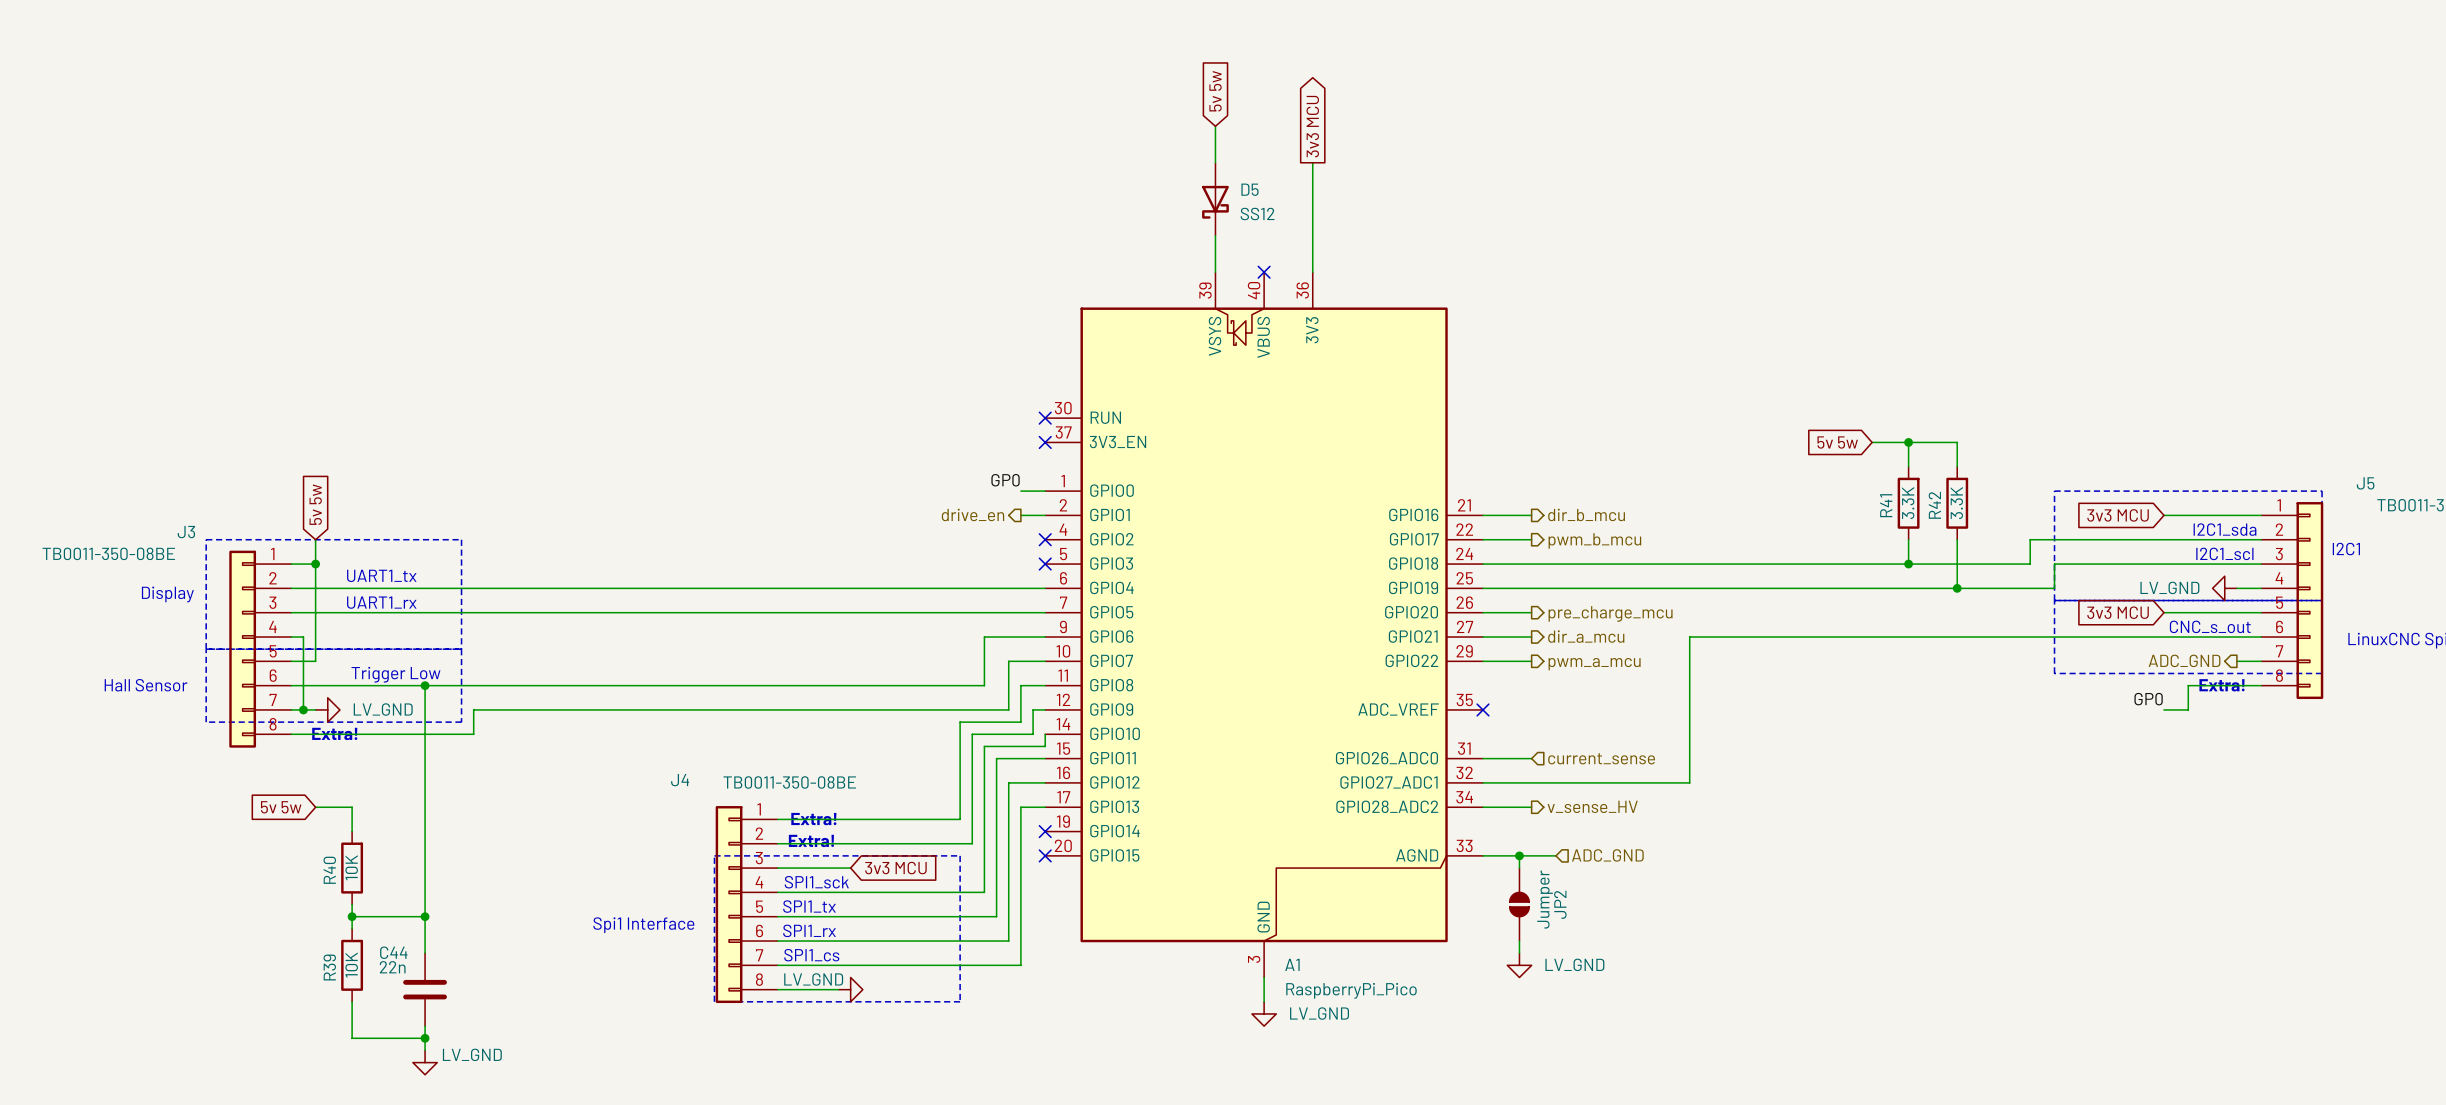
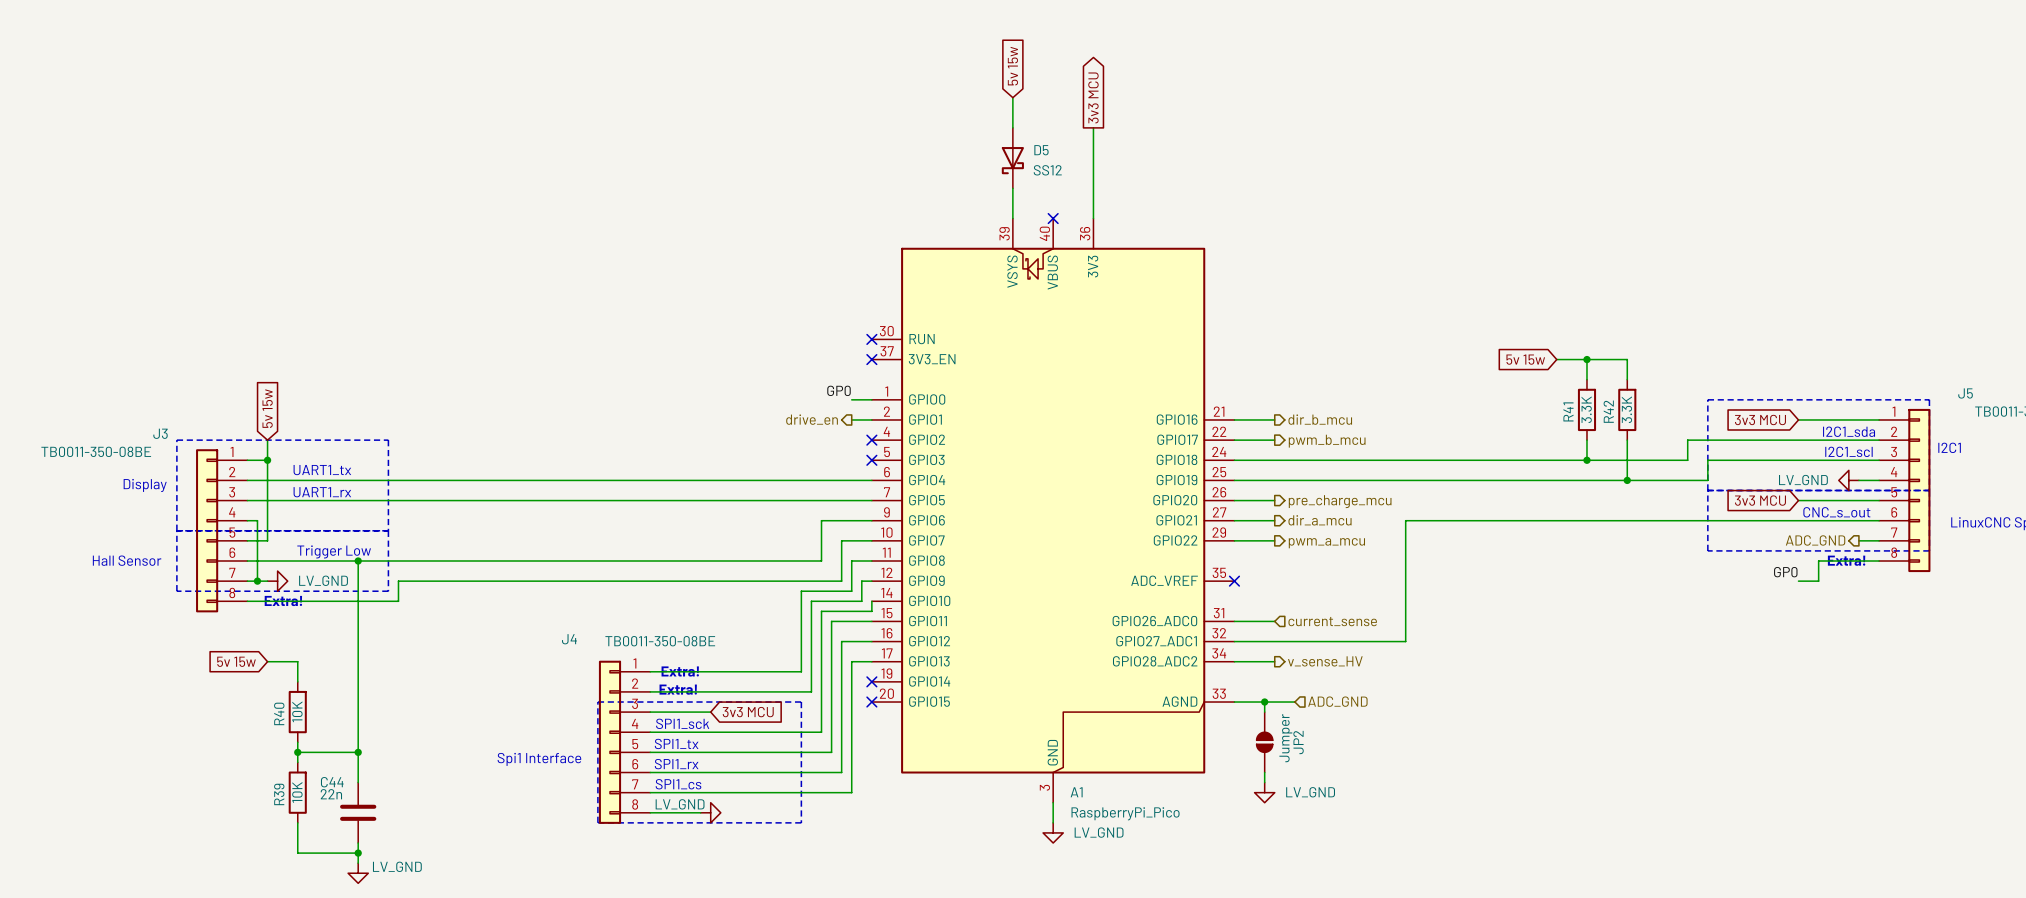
global label: 5v 5w (1215, 91) -> 5v 15w (1012, 66)
global label: 5v 5w (1837, 442) -> 5v 15w (1525, 359)
global label: 5v 5w (315, 504) -> 5v 15w (267, 408)
global label: 5v 5w (281, 807) -> 5v 15w (236, 661)

